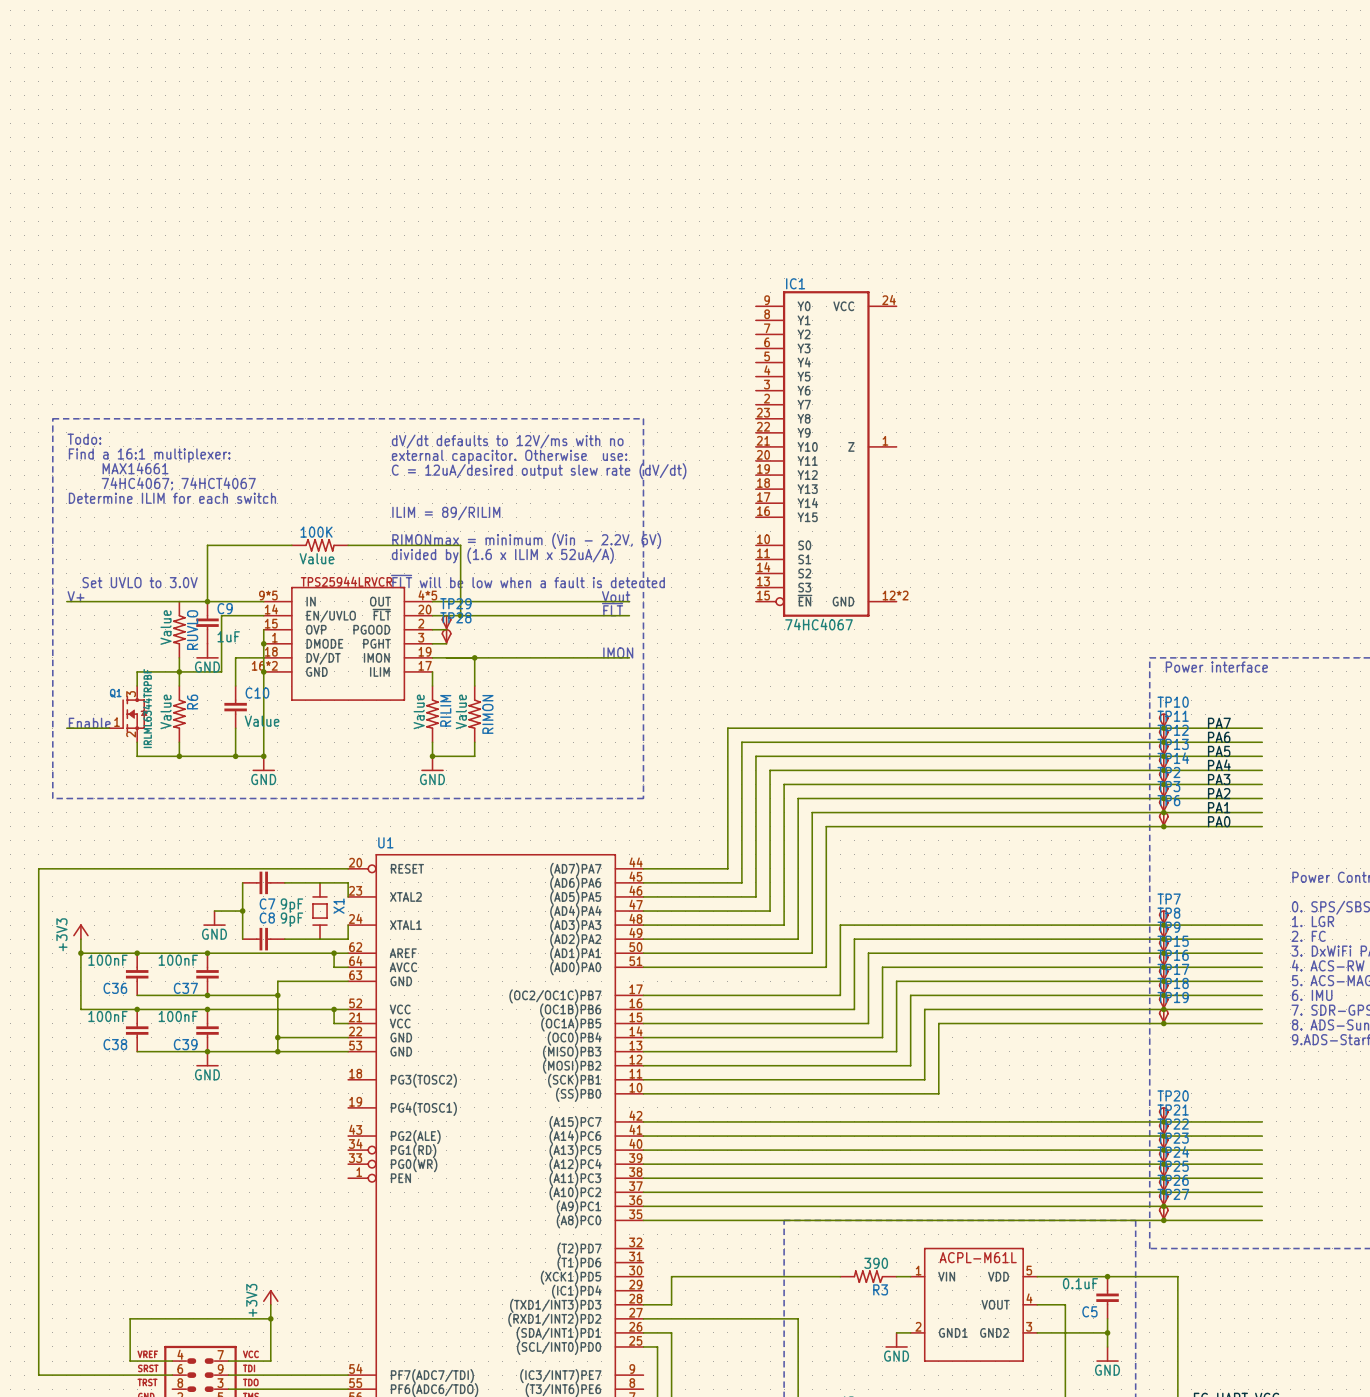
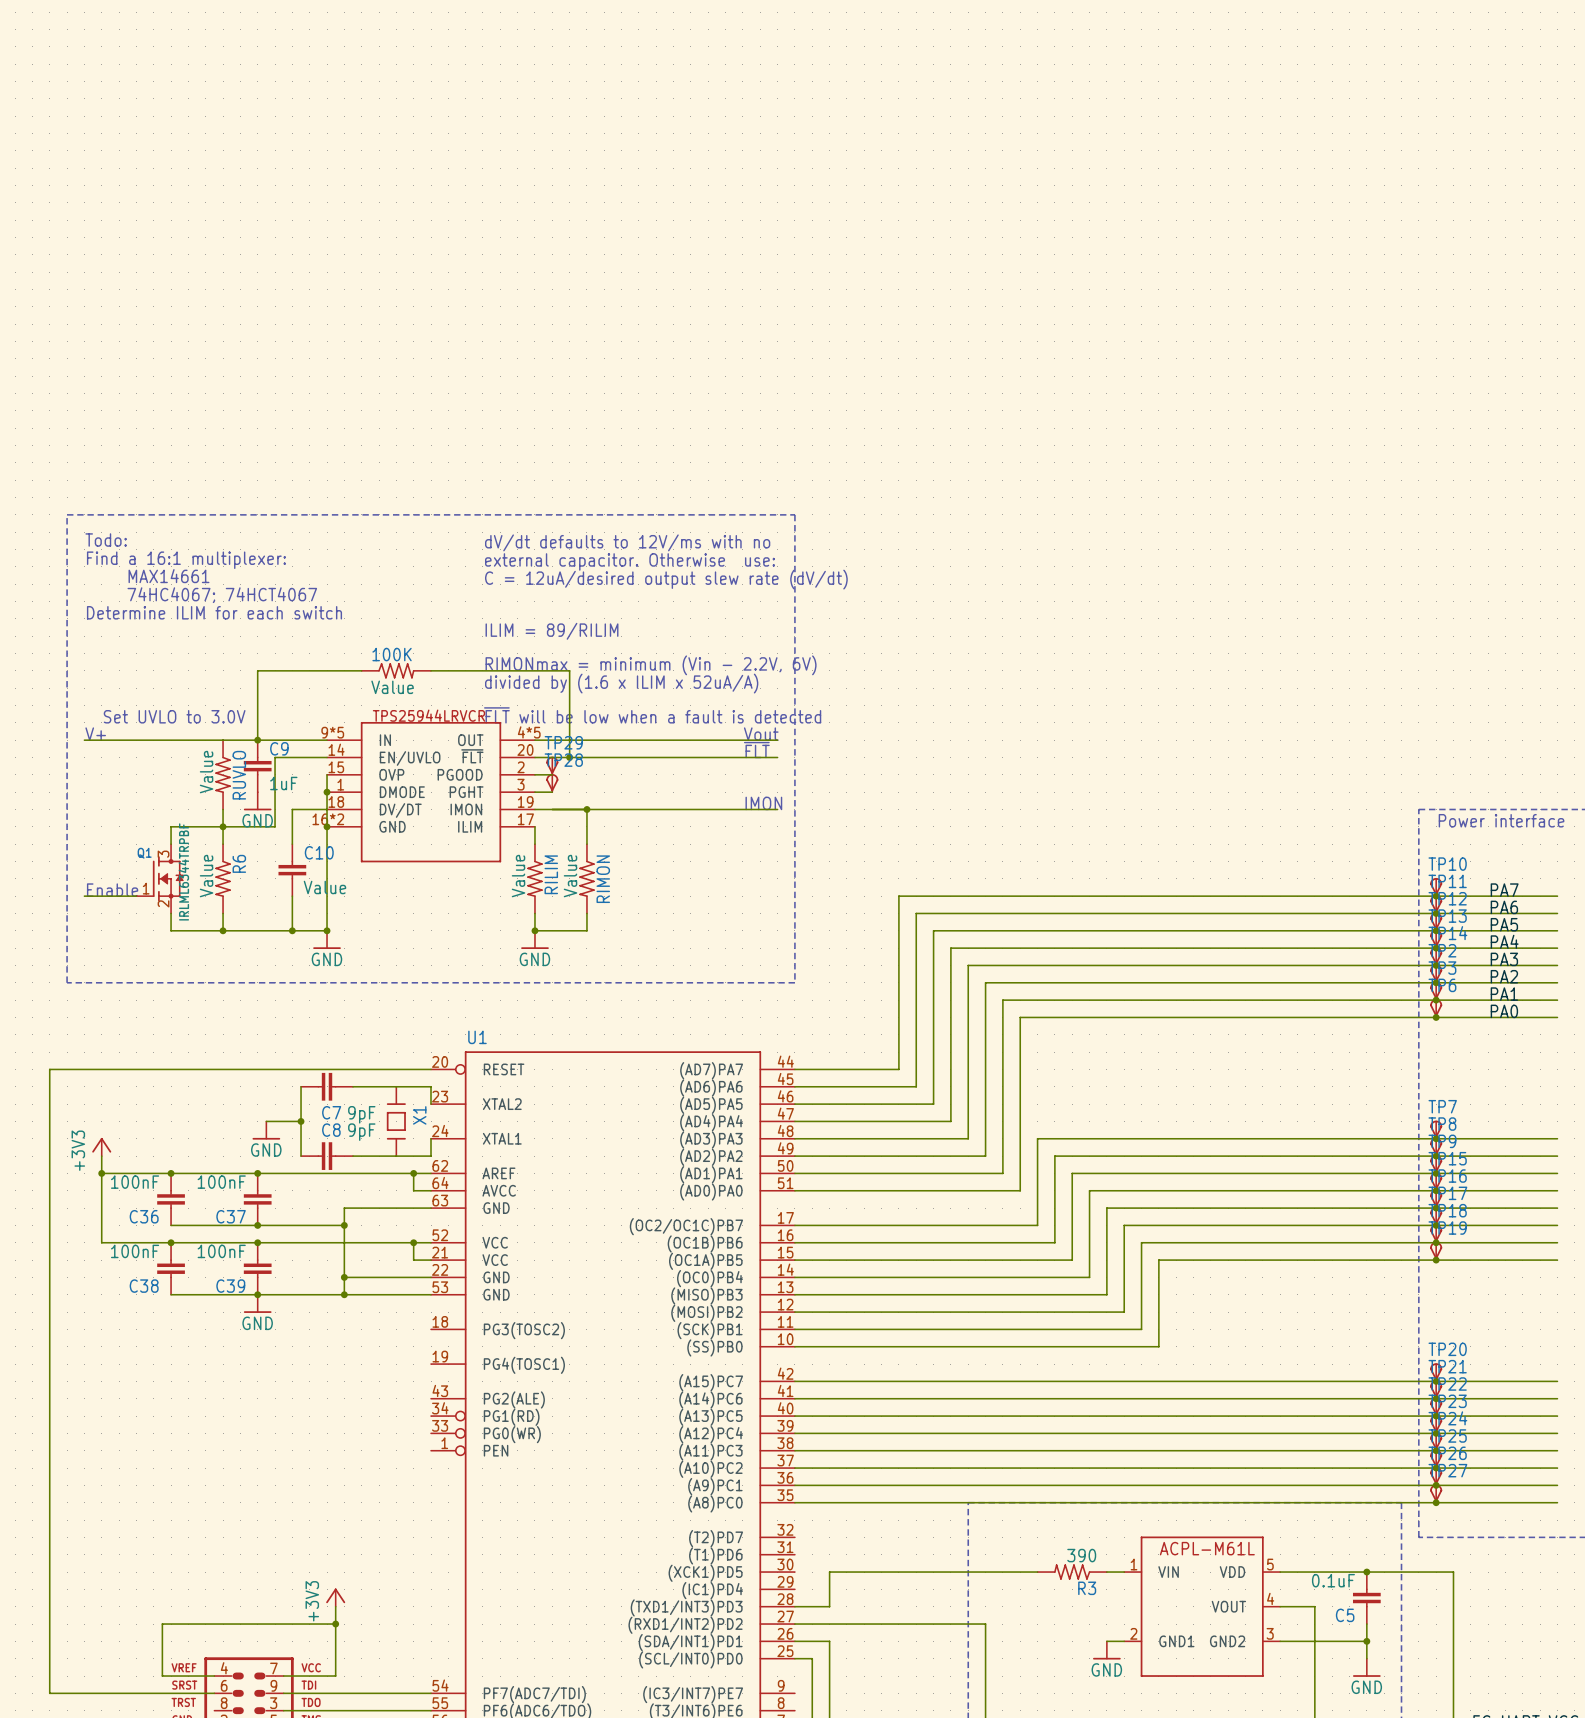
IC1: 74HC4067 (826, 453) -> none

